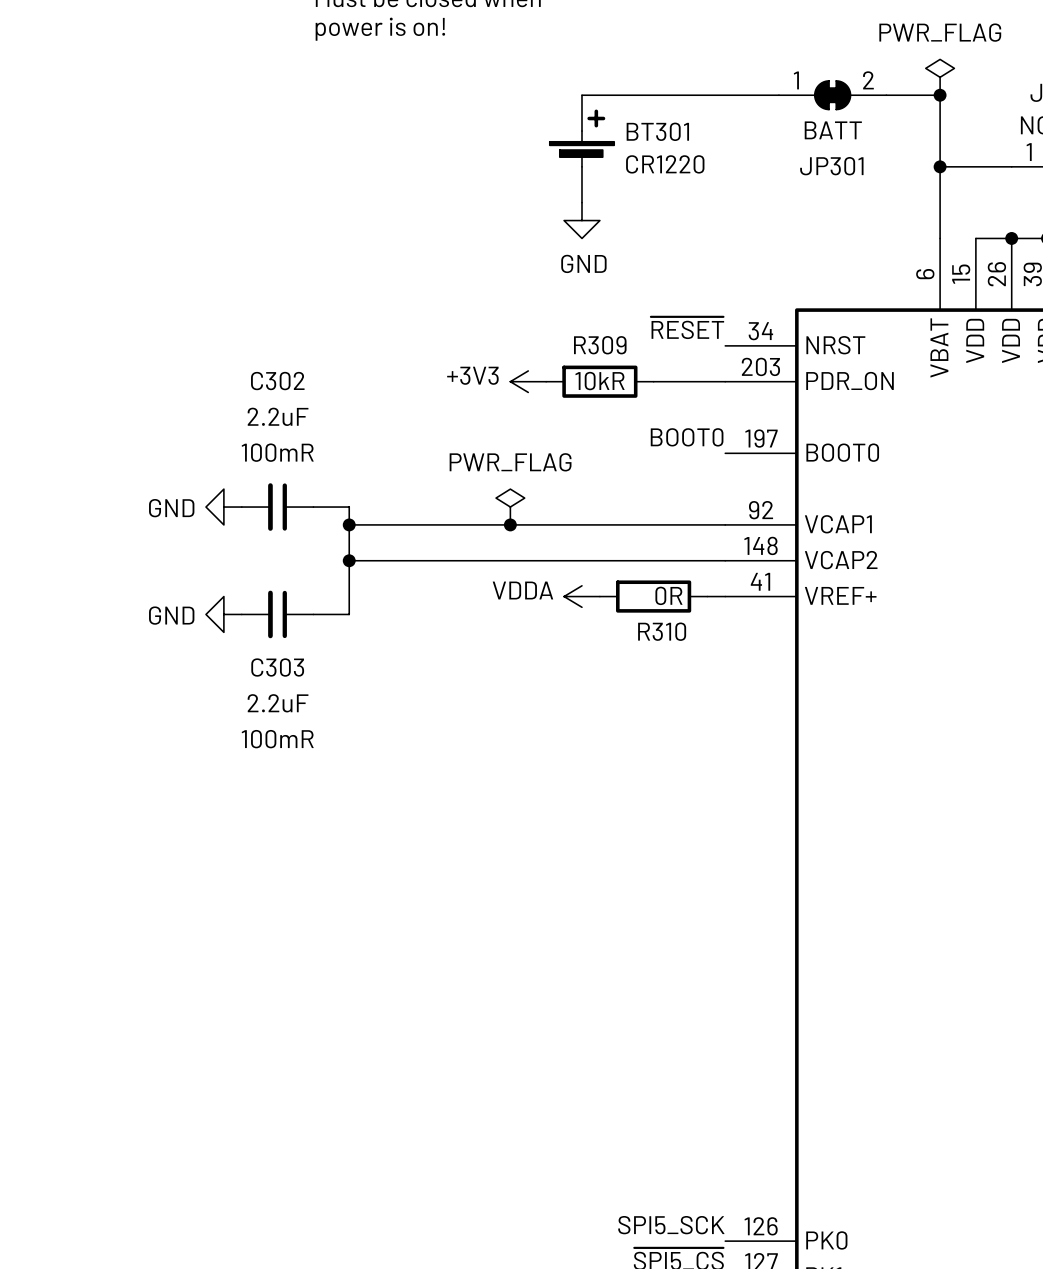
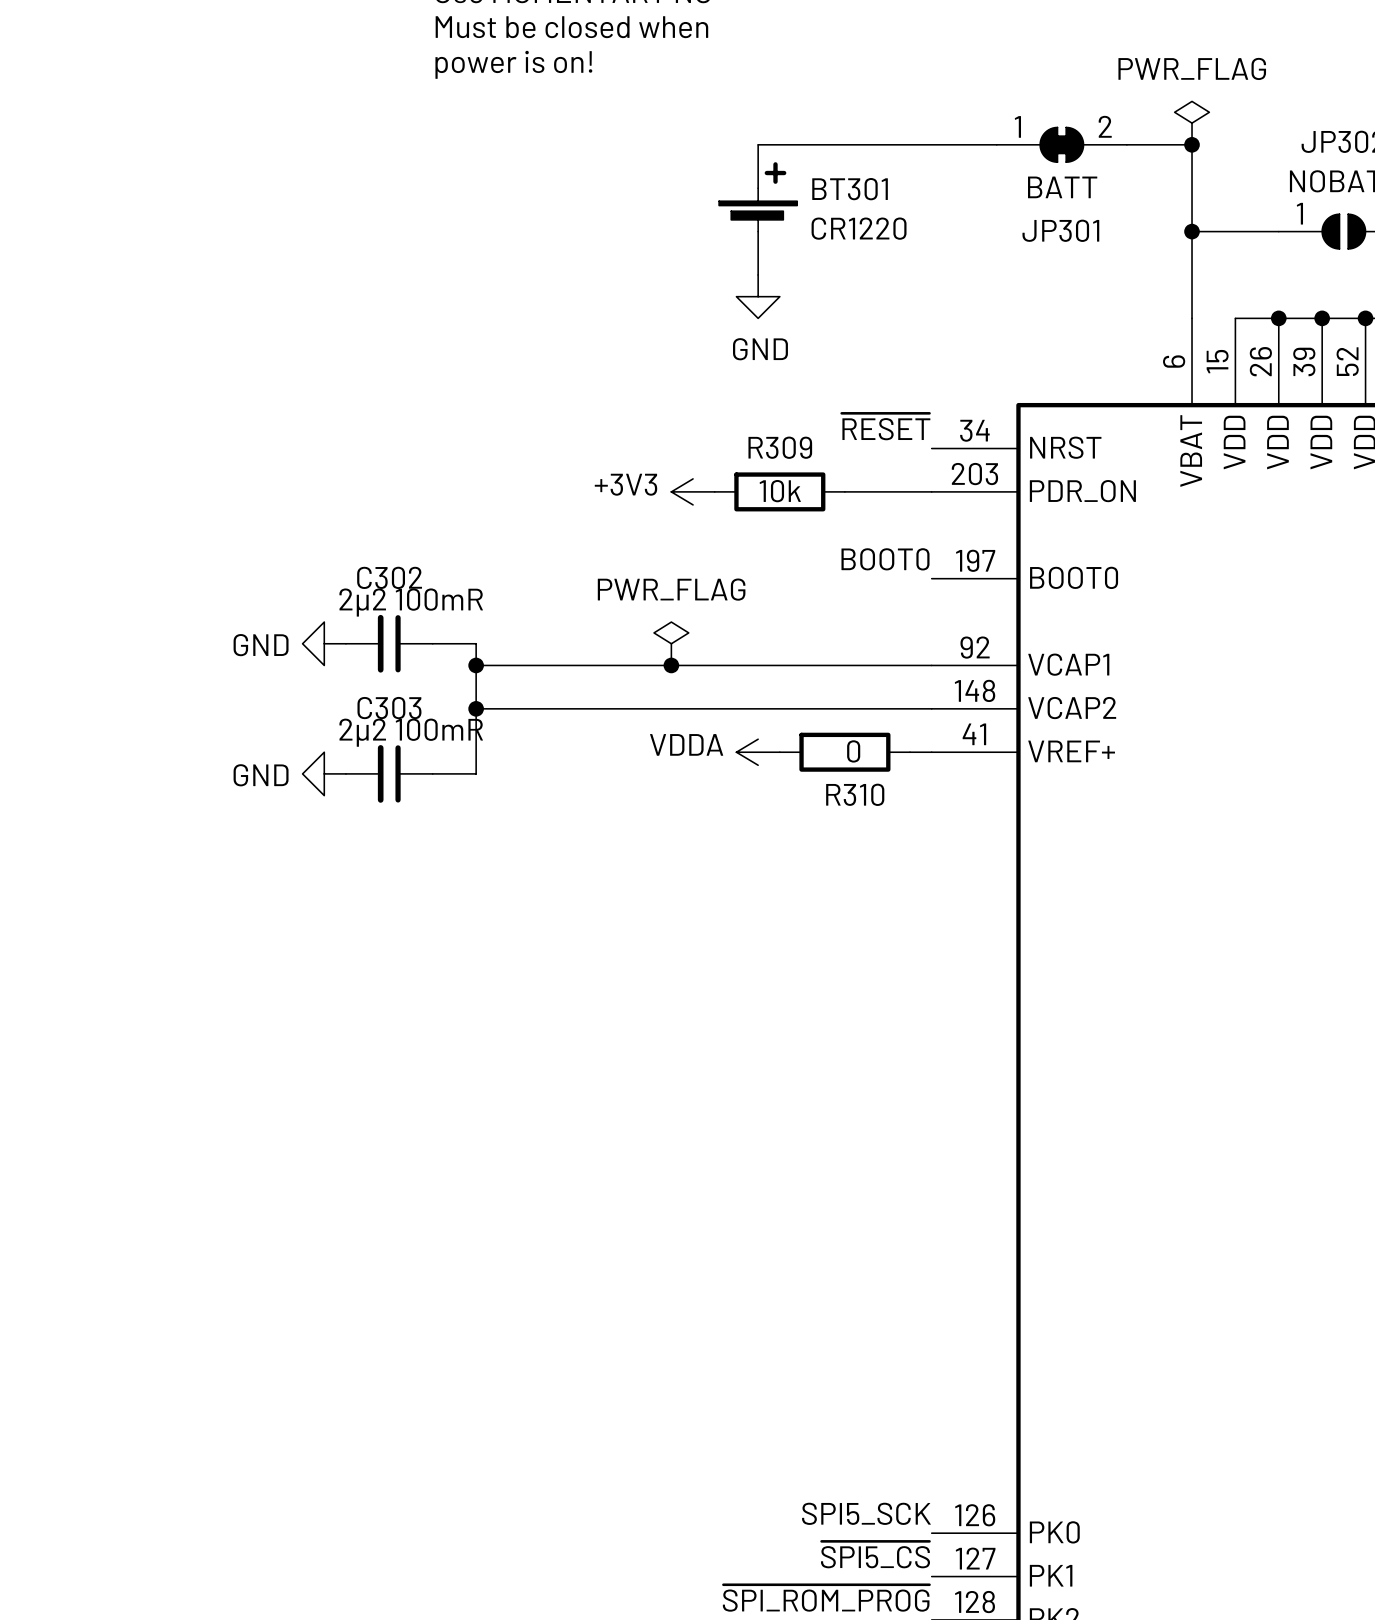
C302 name position: C302 (277, 381) -> C302 (389, 577)
R309 value: 10kR (600, 381) -> 10k (780, 491)
C302 value: 2.2uF (278, 416) -> 2µ2 100mR (411, 602)
C302 text: 100mR (277, 452) -> none
R310 value: 0R (668, 595) -> 0 (853, 751)
C303 name position: C303 (277, 667) -> C303 (389, 708)
C303 value: 2.2uF (278, 703) -> 2µ2 100mR (411, 732)
C303 text: 100mR (277, 739) -> none

